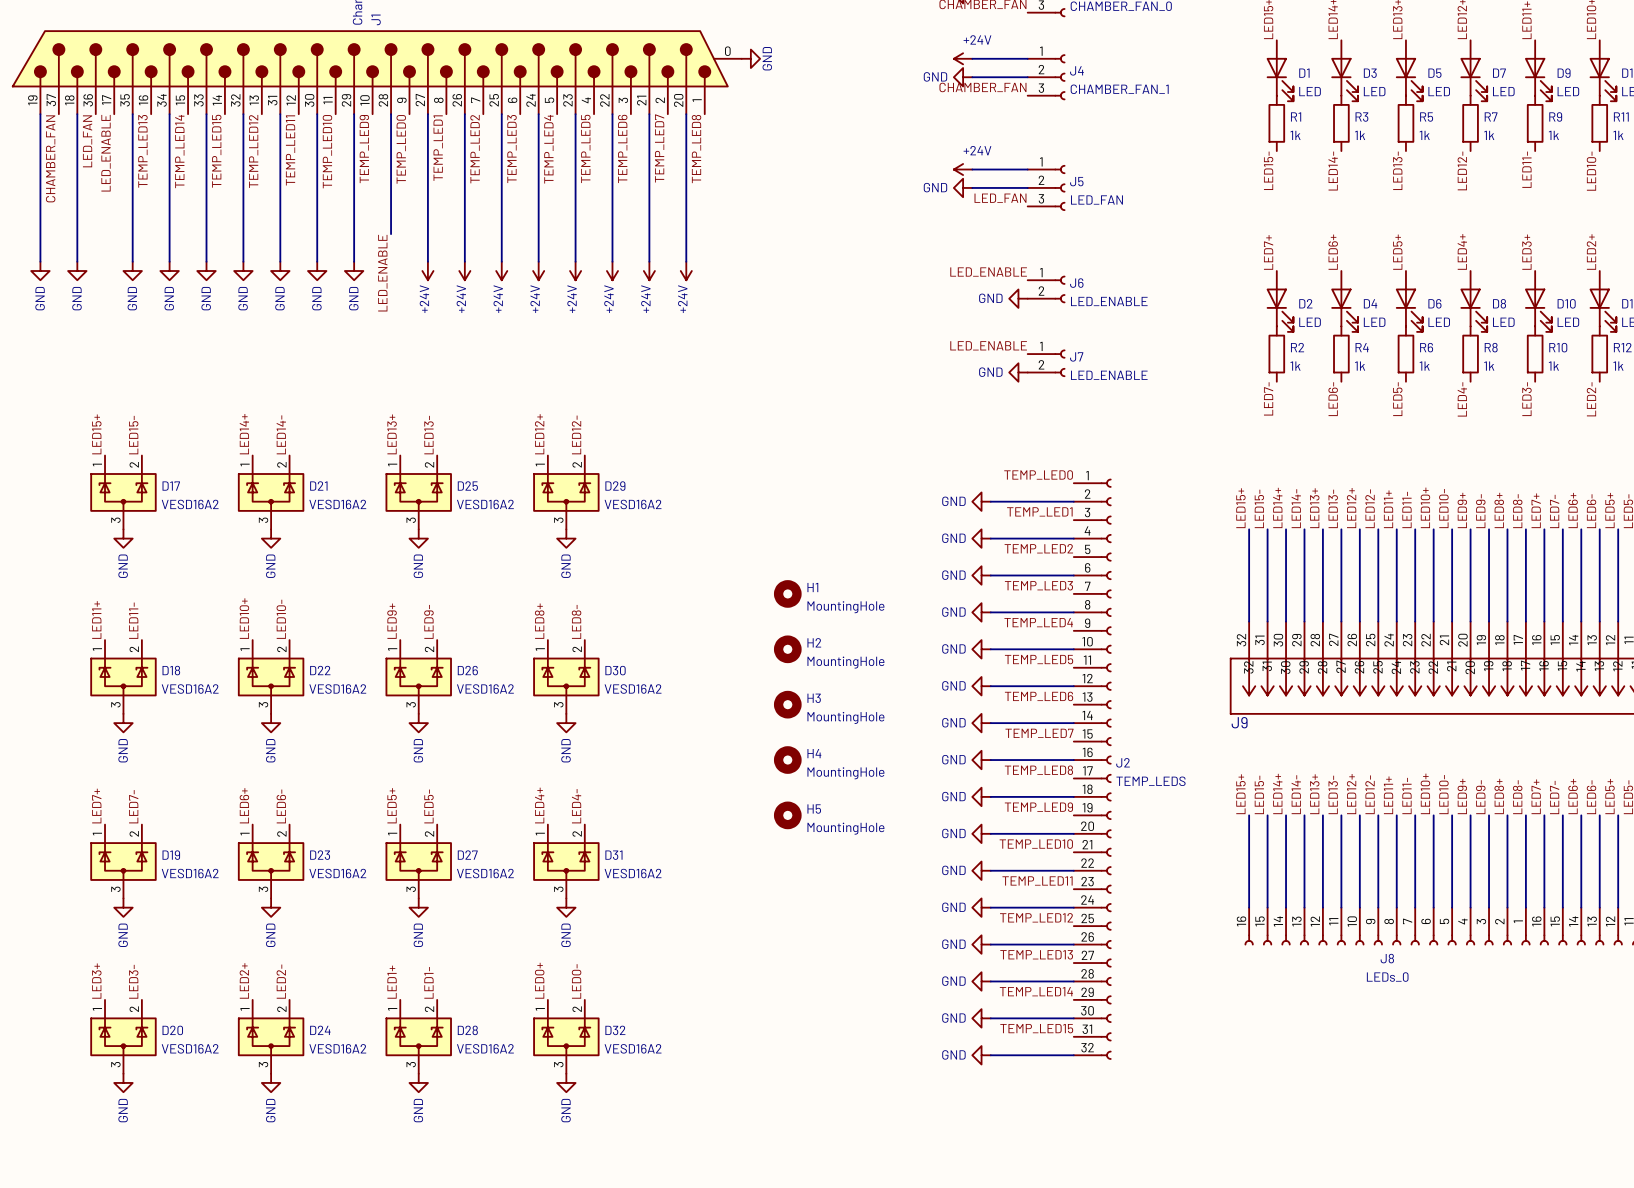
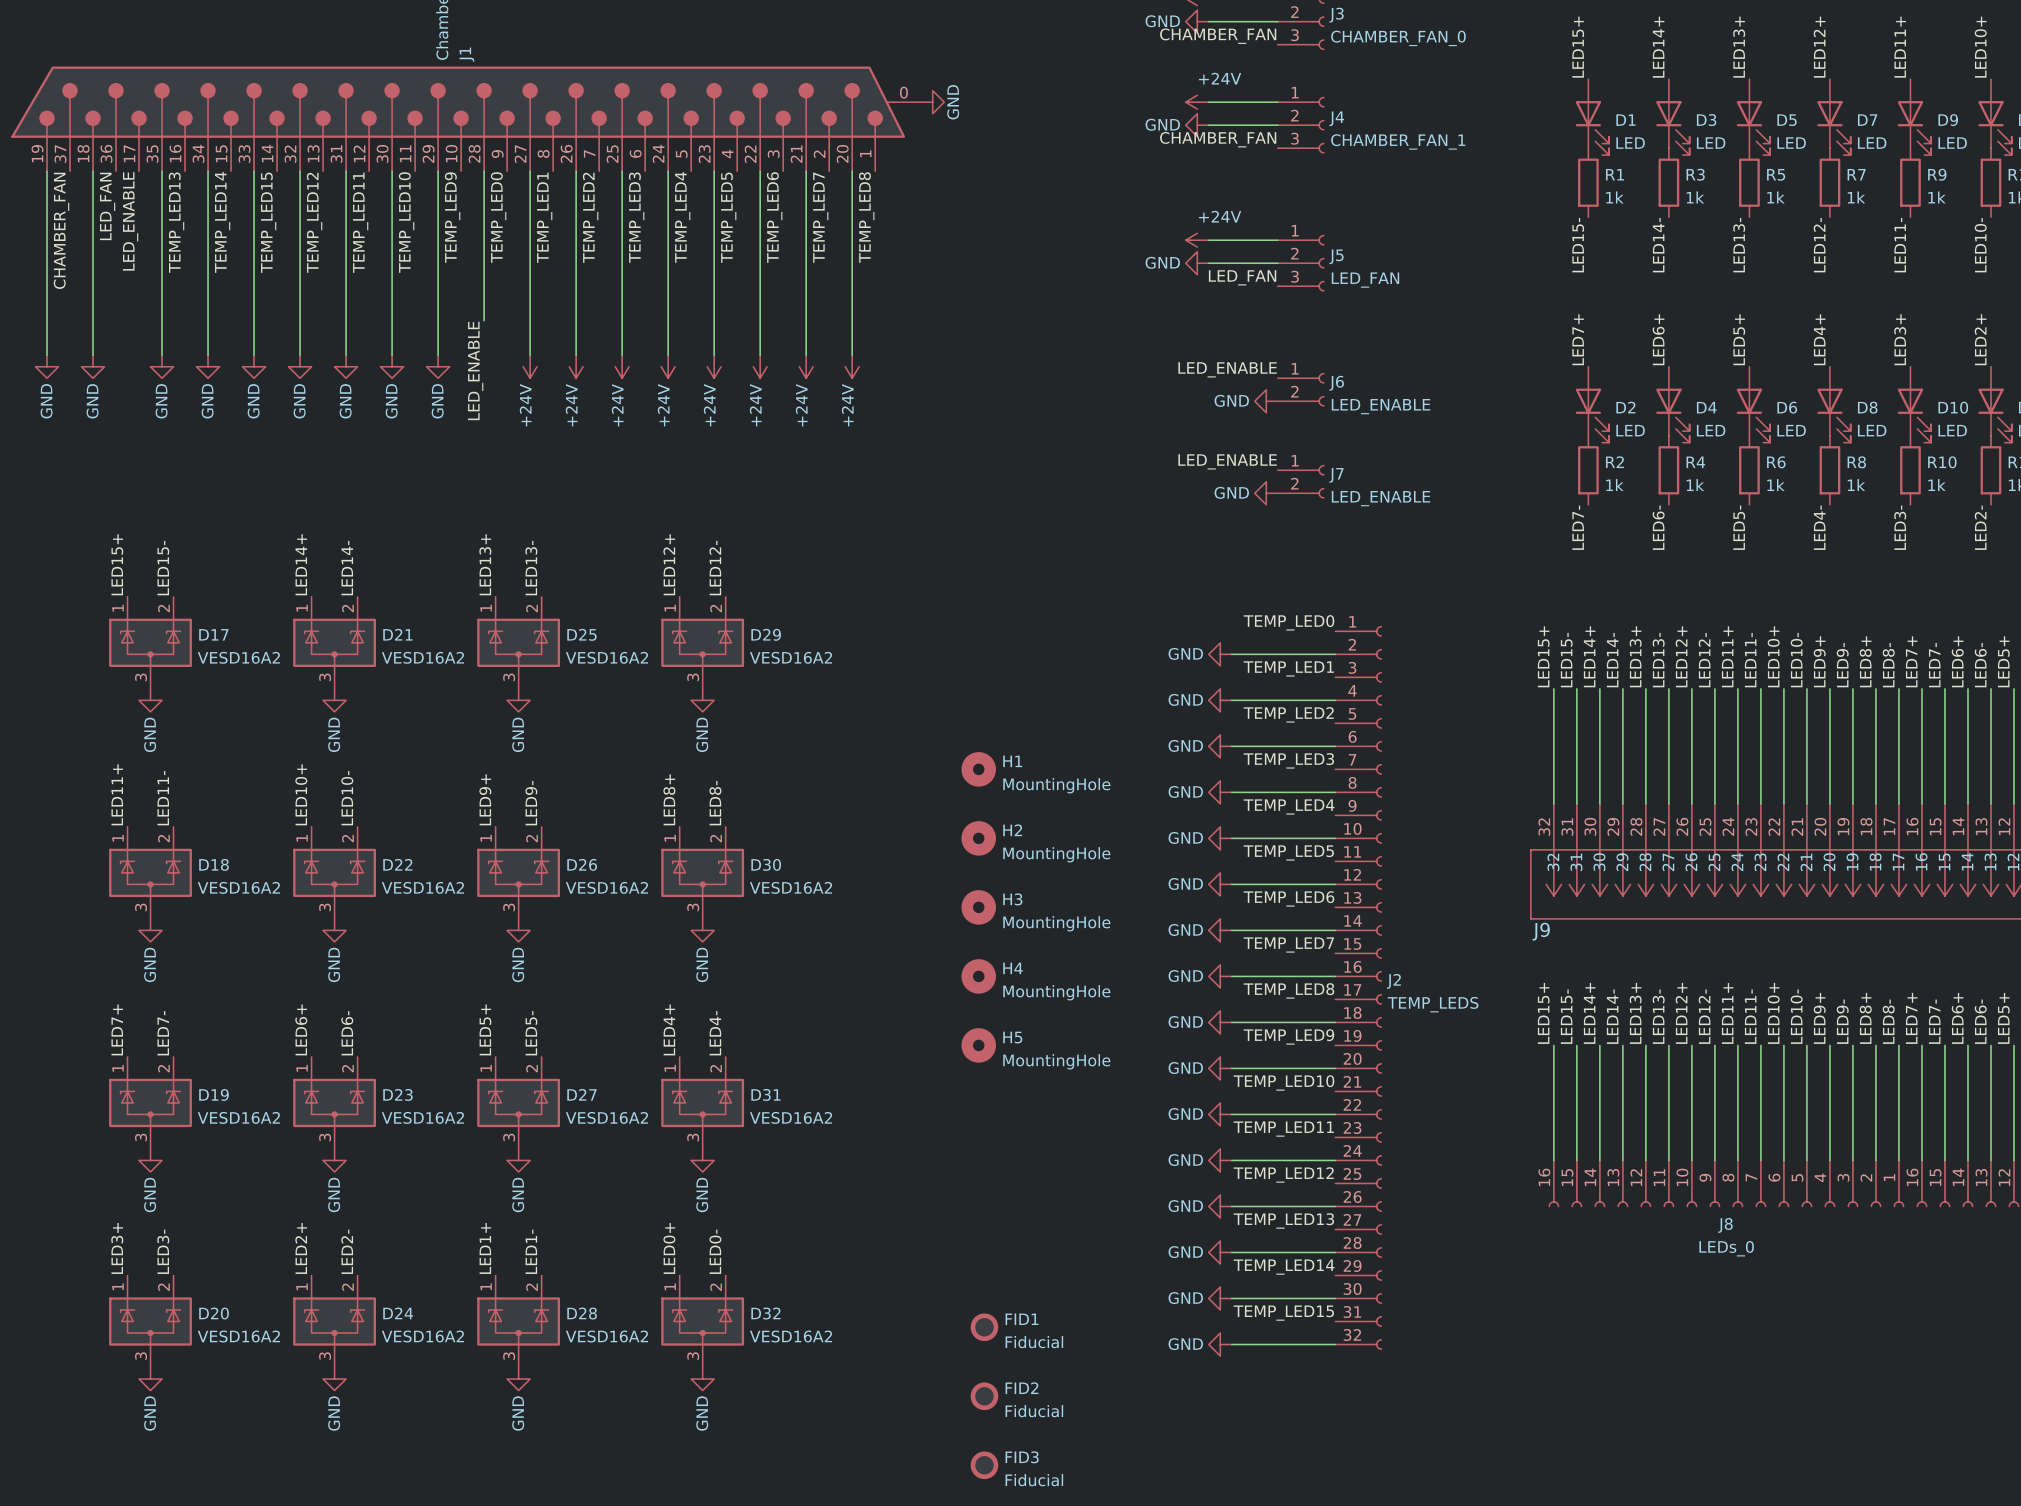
FID1: none -> Fiducial (984, 1327)
FID2: none -> Fiducial (984, 1396)
FID3: none -> Fiducial (984, 1465)

